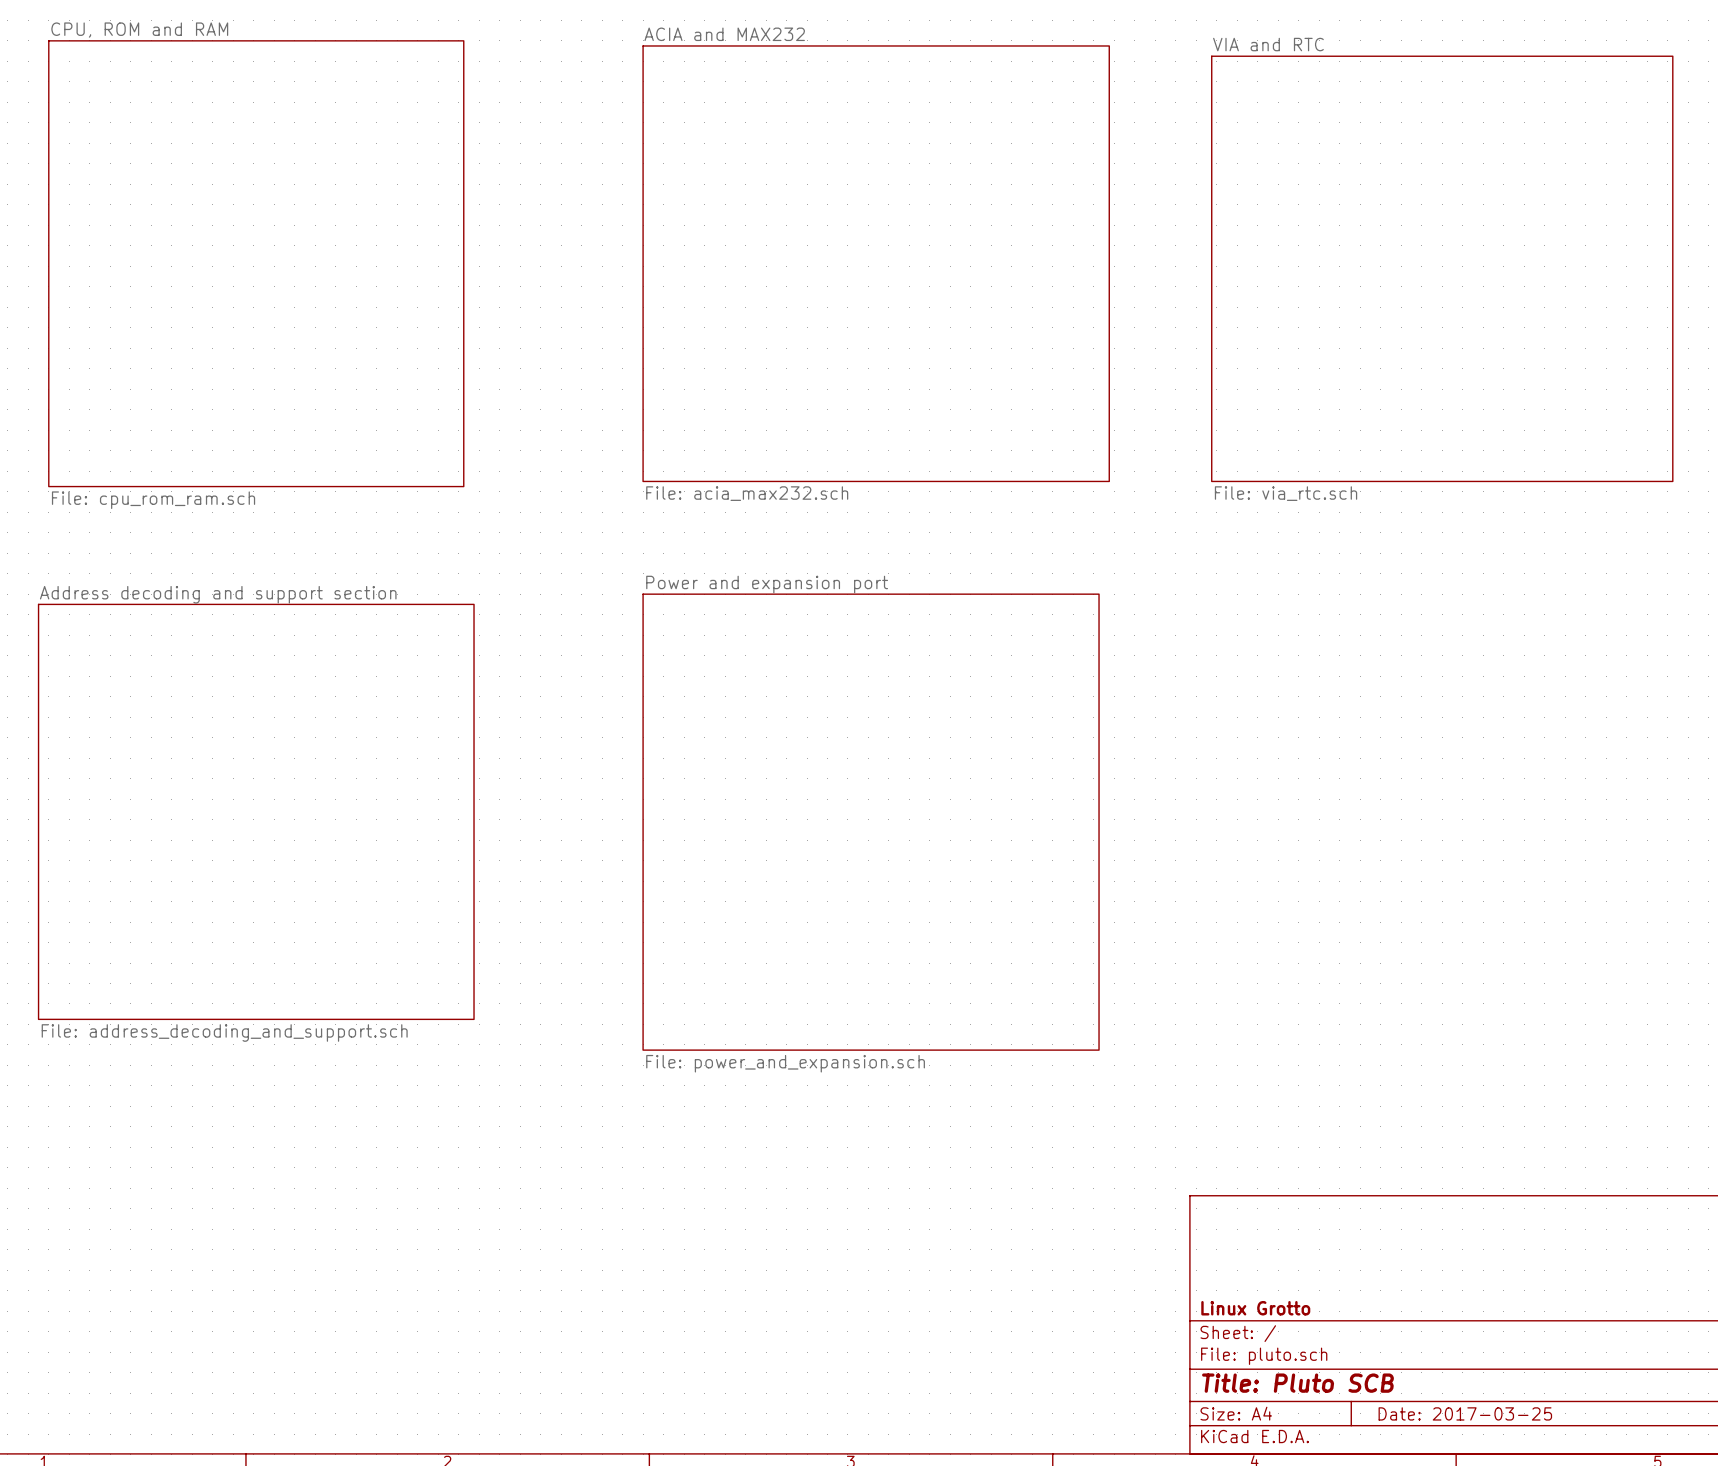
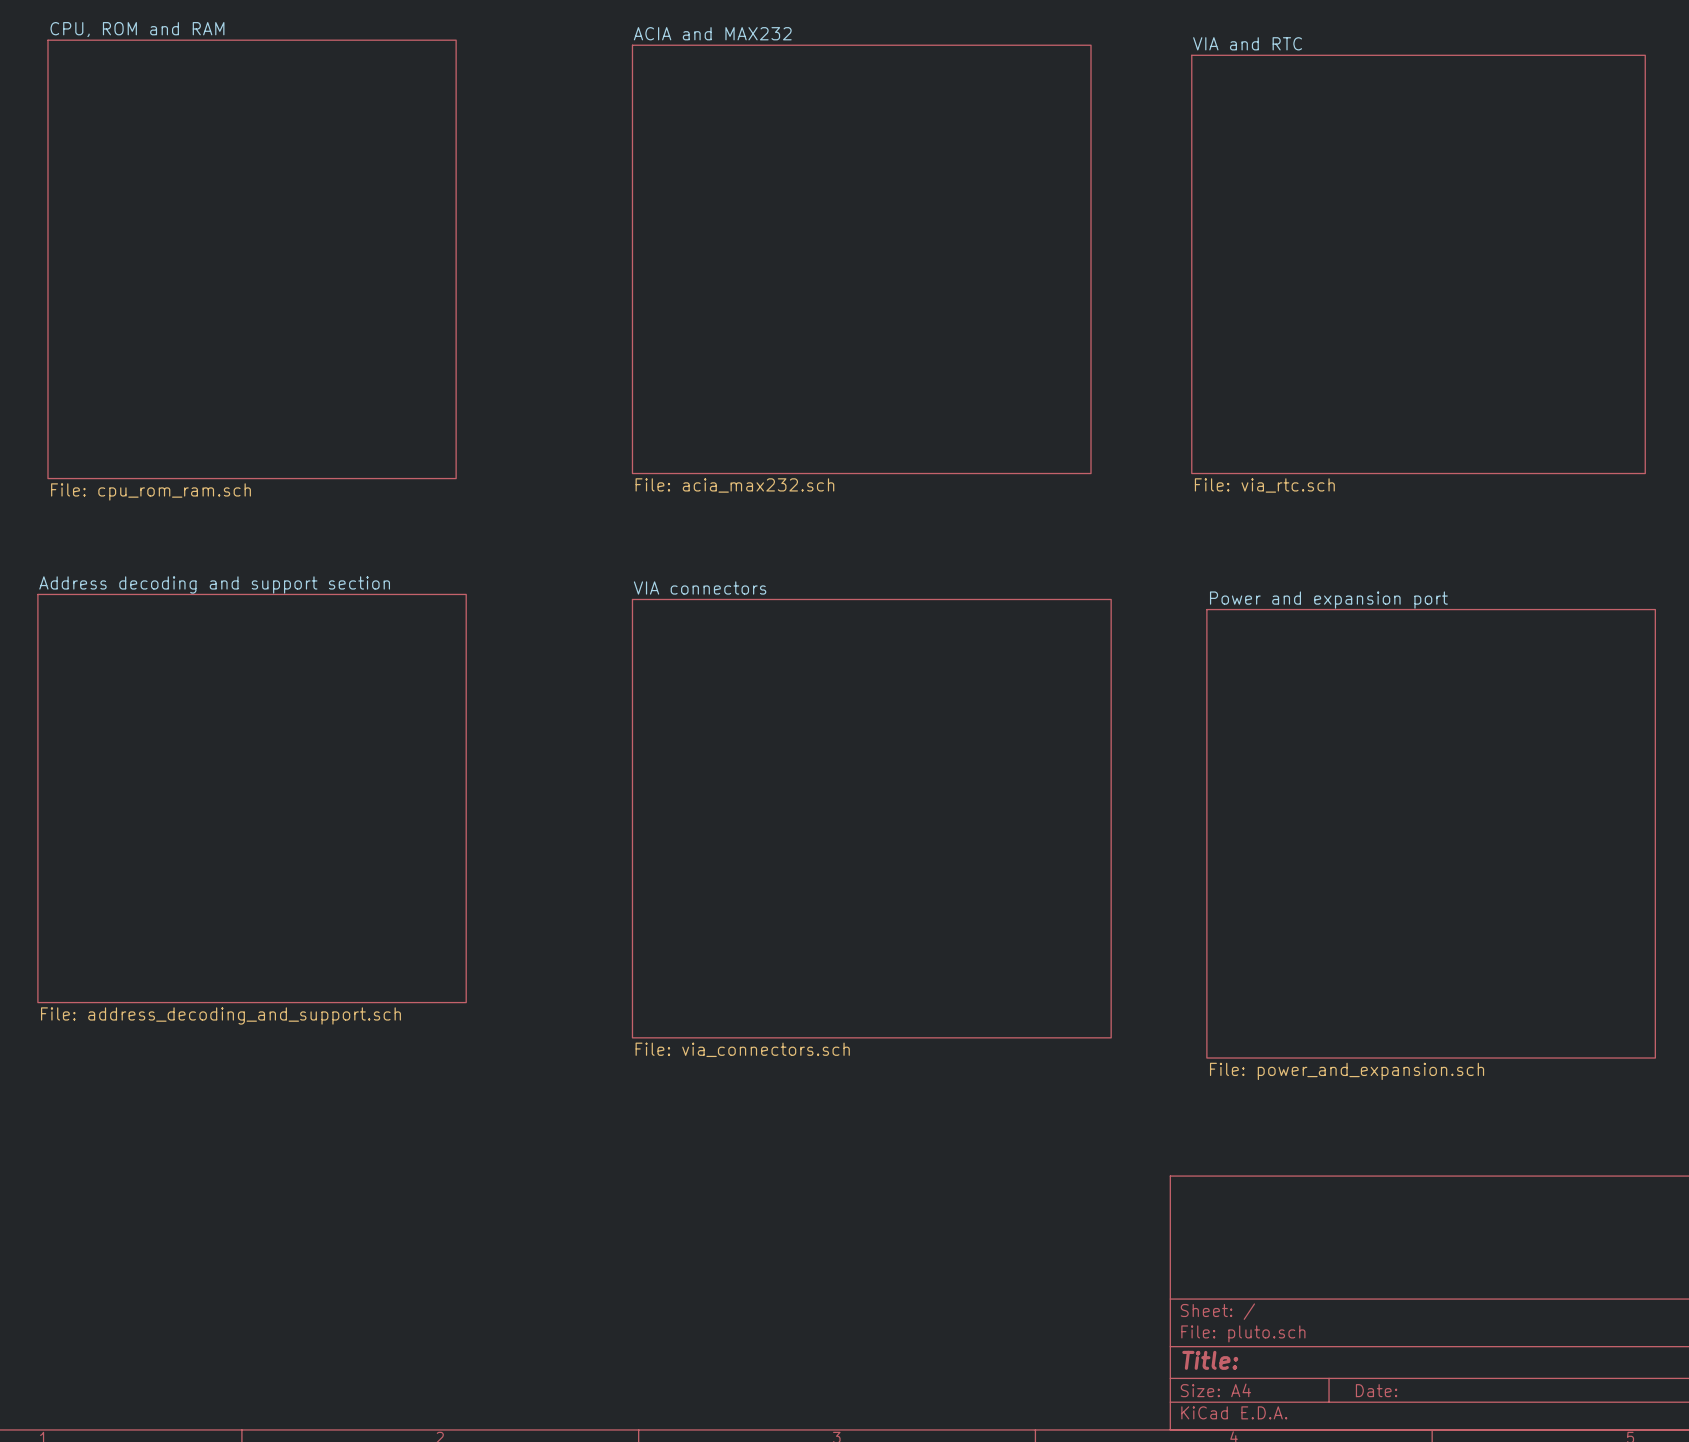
sheet Power and expansion port: File: power_and_expansion.sch (871, 822) -> none
sheet VIA connectors: none -> File: via_connectors.sch (871, 818)
sheet Power and expansion port: none -> File: power_and_expansion.sch (1431, 833)
title block: Linux Grotto (1255, 1308) -> none
title block: Title: Pluto SCB (1297, 1383) -> Title: (1210, 1360)
title block: Date: 2017-03-25 (1465, 1413) -> Date: (1376, 1390)

